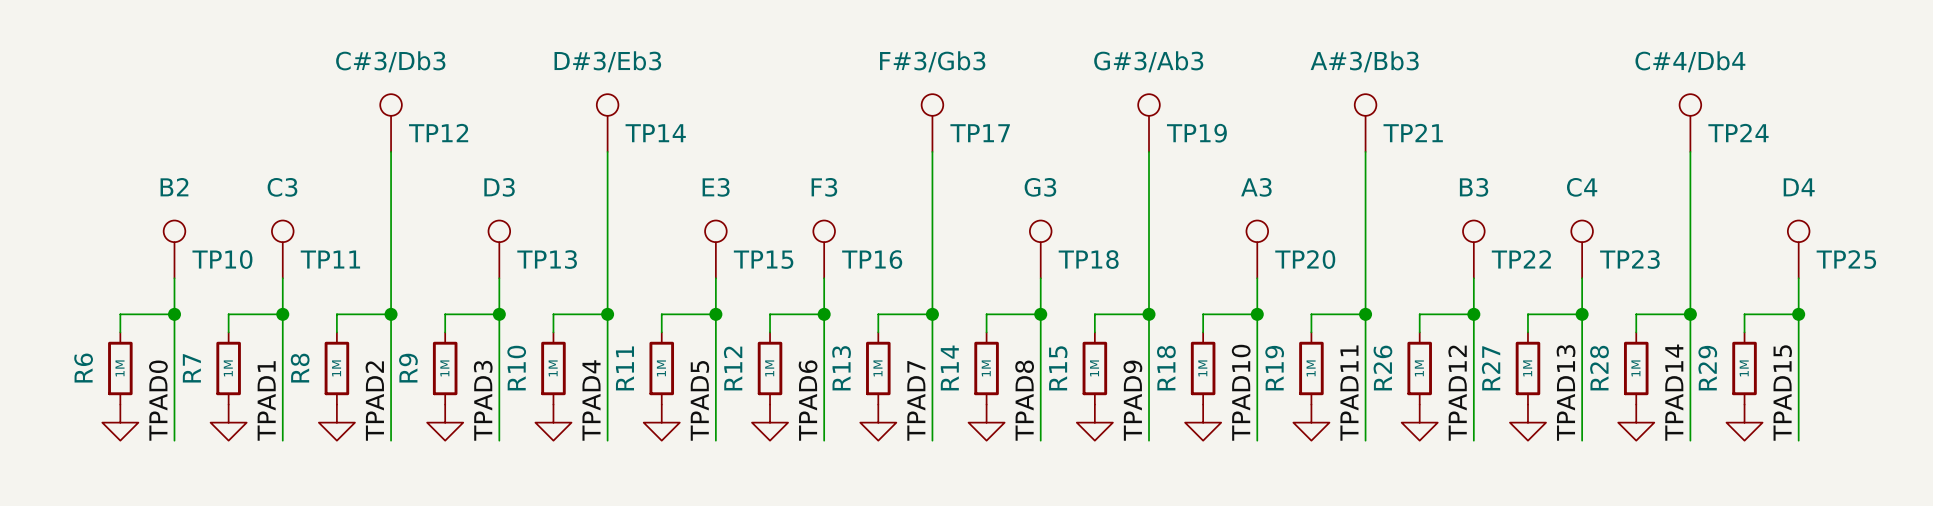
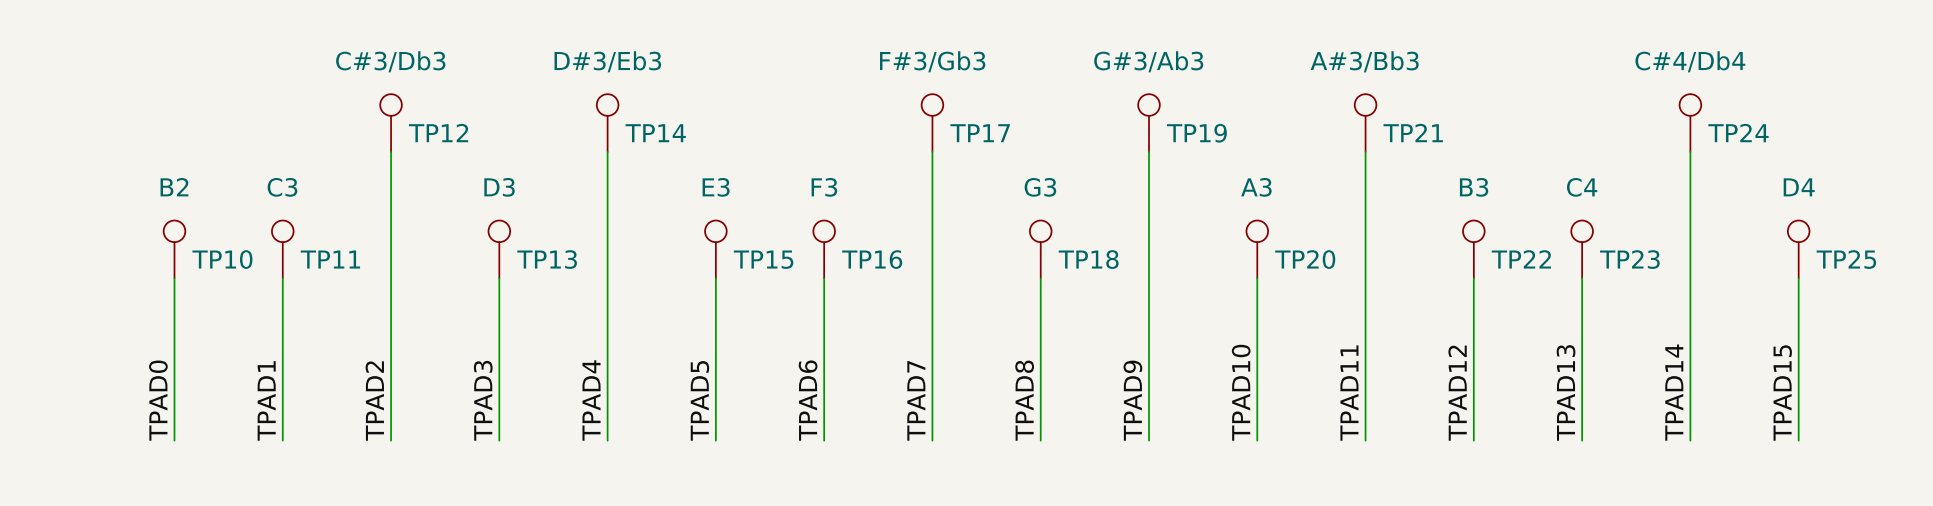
wire: (174, 314) (120, 314) (120, 332) -> none
junction: (174, 314) -> none
wire: (282, 314) (228, 314) (228, 332) -> none
junction: (282, 314) -> none
wire: (391, 314) (336, 314) (336, 332) -> none
junction: (391, 314) -> none
wire: (499, 314) (445, 314) (445, 332) -> none
junction: (499, 314) -> none
wire: (607, 314) (553, 314) (553, 332) -> none
junction: (607, 314) -> none
wire: (715, 314) (661, 314) (661, 332) -> none
junction: (715, 314) -> none
wire: (824, 314) (770, 314) (770, 332) -> none
junction: (824, 314) -> none
wire: (932, 314) (878, 314) (878, 332) -> none
junction: (932, 314) -> none
wire: (1040, 314) (986, 314) (986, 332) -> none
junction: (1040, 314) -> none
wire: (1149, 314) (1094, 314) (1094, 332) -> none
junction: (1149, 314) -> none
wire: (1257, 314) (1203, 314) (1203, 332) -> none
junction: (1257, 314) -> none
wire: (1365, 314) (1311, 314) (1311, 332) -> none
junction: (1365, 314) -> none
wire: (1473, 314) (1419, 314) (1419, 332) -> none
junction: (1473, 314) -> none
wire: (1582, 314) (1527, 314) (1527, 332) -> none
junction: (1582, 314) -> none
wire: (1690, 314) (1636, 314) (1636, 332) -> none
junction: (1690, 314) -> none
wire: (1798, 314) (1744, 314) (1744, 332) -> none
junction: (1798, 314) -> none
R6: 1M (120, 368) -> none
R7: 1M (228, 368) -> none
R8: 1M (336, 368) -> none
R9: 1M (445, 368) -> none
R10: 1M (553, 368) -> none
R11: 1M (661, 368) -> none
R12: 1M (770, 368) -> none
R13: 1M (878, 368) -> none
R14: 1M (986, 368) -> none
R15: 1M (1094, 368) -> none
R18: 1M (1203, 368) -> none
R19: 1M (1311, 368) -> none
R26: 1M (1419, 368) -> none
R27: 1M (1527, 368) -> none
R28: 1M (1636, 368) -> none
R29: 1M (1744, 368) -> none
power symbol: (120, 422) -> none
power symbol: (228, 422) -> none
power symbol: (336, 422) -> none
power symbol: (445, 422) -> none
power symbol: (553, 422) -> none
power symbol: (661, 422) -> none
power symbol: (770, 422) -> none
power symbol: (878, 422) -> none
power symbol: (986, 422) -> none
power symbol: (1094, 422) -> none
power symbol: (1203, 422) -> none
power symbol: (1311, 422) -> none
power symbol: (1419, 422) -> none
power symbol: (1527, 422) -> none
power symbol: (1636, 422) -> none
power symbol: (1744, 422) -> none

